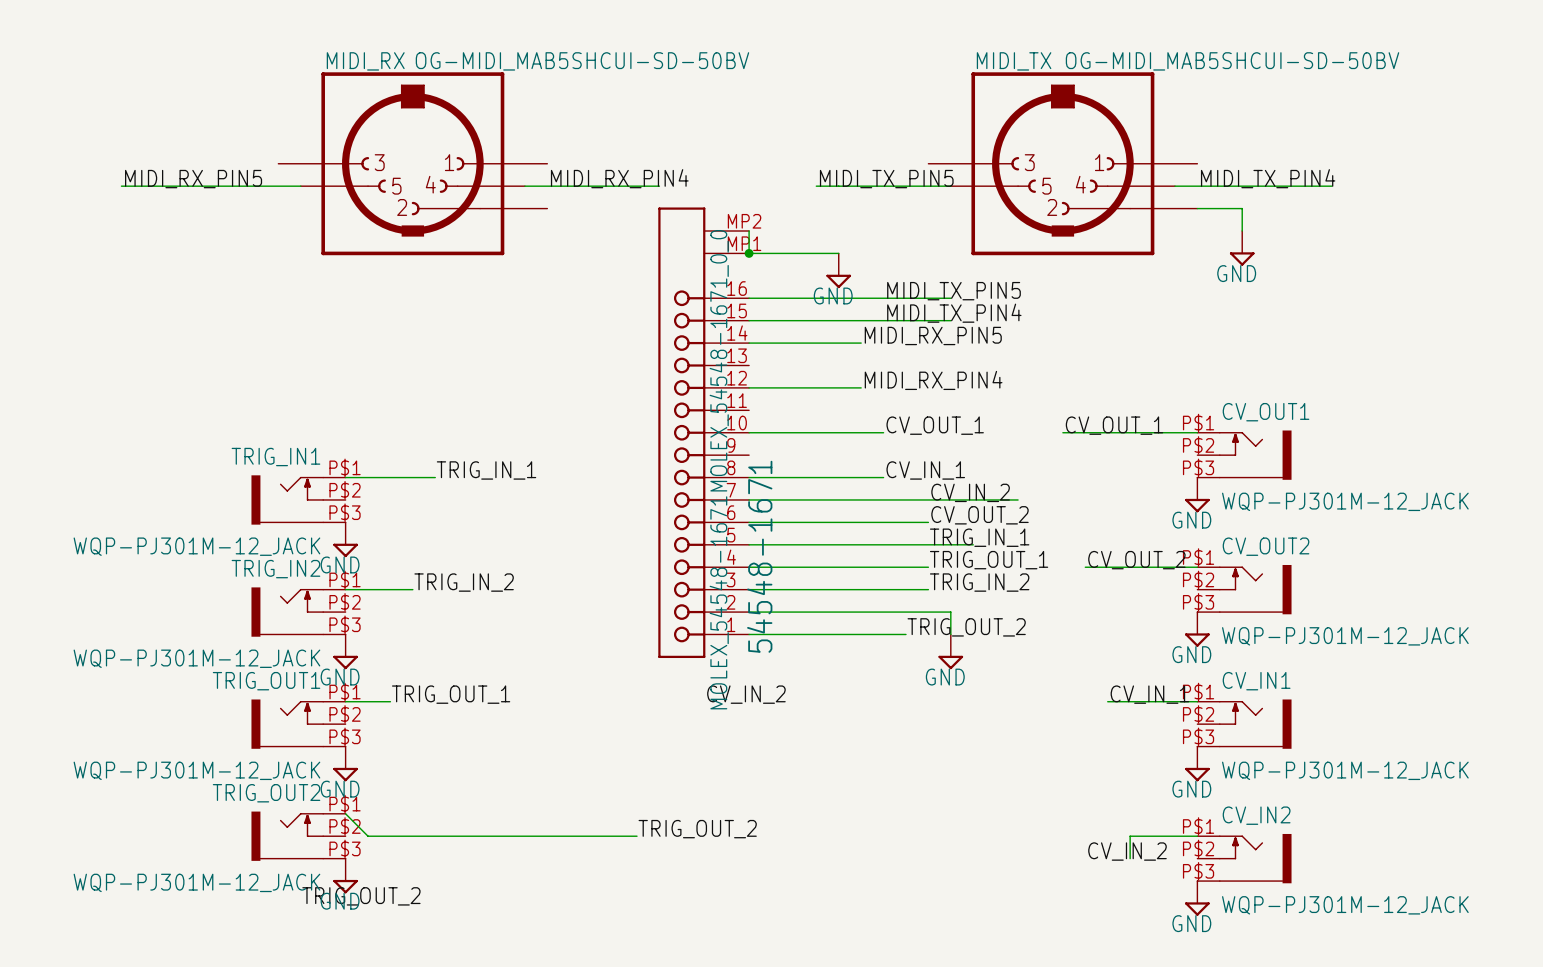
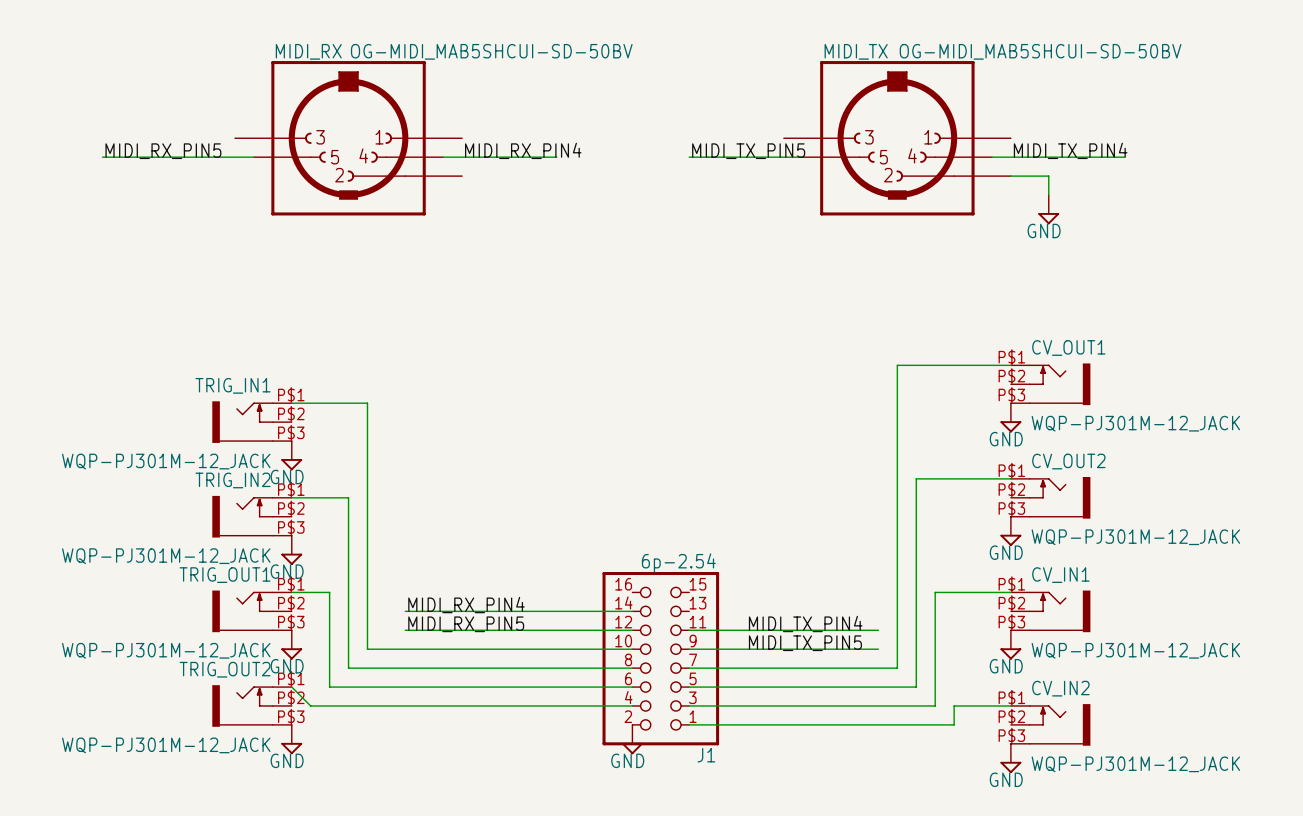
wire: (749, 231) (749, 253) (838, 253) -> none
junction: (749, 253) -> none
power symbol: GND (838, 270) -> none
label: MIDI_TX_PIN5 (953, 291) -> none
wire: (749, 298) (950, 298) -> none
label: MIDI_TX_PIN4 (954, 313) -> none
wire: (749, 320) (950, 320) -> none
label: MIDI_RX_PIN5 (933, 335) -> none
wire: (749, 343) (861, 343) -> none
label: MIDI_RX_PIN4 (933, 380) -> none
wire: (749, 387) (861, 387) -> none
label: CV_OUT_1 (935, 425) -> none
label: CV_OUT_1 (1114, 425) -> none
part: MOLEX_54548-1671MOLEX_54548-1671_0_0 (703, 432) -> none
wire: (749, 432) (883, 432) -> none
wire: none -> (897, 365) (897, 668) (689, 668)
label: TRIG_IN_1 (486, 470) -> none
label: CV_IN_1 (925, 470) -> none
wire: none -> (367, 403) (367, 649) (632, 649)
wire: (749, 477) (883, 477) -> none
label: CV_IN_2 (970, 492) -> none
wire: (749, 499) (1018, 499) -> none
label: CV_OUT_2 (980, 515) -> none
wire: (749, 522) (928, 522) -> none
label: TRIG_IN_1 (979, 537) -> none
wire: (749, 544) (973, 544) -> (689, 630) (878, 630)
label: TRIG_OUT_1 (989, 560) -> none
label: CV_OUT_2 (1136, 560) -> none
wire: (749, 567) (928, 567) -> none
wire: none -> (916, 478) (916, 687) (689, 687)
label: TRIG_IN_2 (464, 582) -> none
label: TRIG_IN_2 (979, 582) -> none
wire: none -> (348, 497) (348, 668) (632, 668)
wire: (749, 589) (928, 589) -> none
wire: (749, 612) (950, 612) (950, 634) -> none
label: TRIG_OUT_2 (966, 627) -> none
wire: (749, 634) (905, 634) -> none
power symbol: GND (950, 651) -> none
label: TRIG_OUT_1 (451, 694) -> none
label: CV_IN_2 (746, 694) -> none
label: CV_IN_1 (1149, 694) -> none
wire: none -> (329, 592) (329, 687) (632, 687)
wire: none -> (935, 592) (935, 705) (689, 705)
label: none -> MIDI_RX_PIN4 (466, 605)
wire: none -> (405, 611) (632, 611)
label: none -> MIDI_RX_PIN5 (466, 624)
label: none -> MIDI_TX_PIN4 (805, 623)
wire: none -> (405, 630) (632, 630)
label: none -> MIDI_TX_PIN5 (805, 643)
wire: none -> (689, 649) (878, 649)
J1: none -> 6p-2.54 (660, 658)
label: TRIG_OUT_2 (697, 829) -> none
wire: none -> (537, 705) (632, 705)
label: CV_IN_2 (1127, 851) -> none
wire: none -> (689, 724) (954, 724)
power symbol: none -> GND (632, 739)
label: TRIG_OUT_2 (361, 896) -> none

